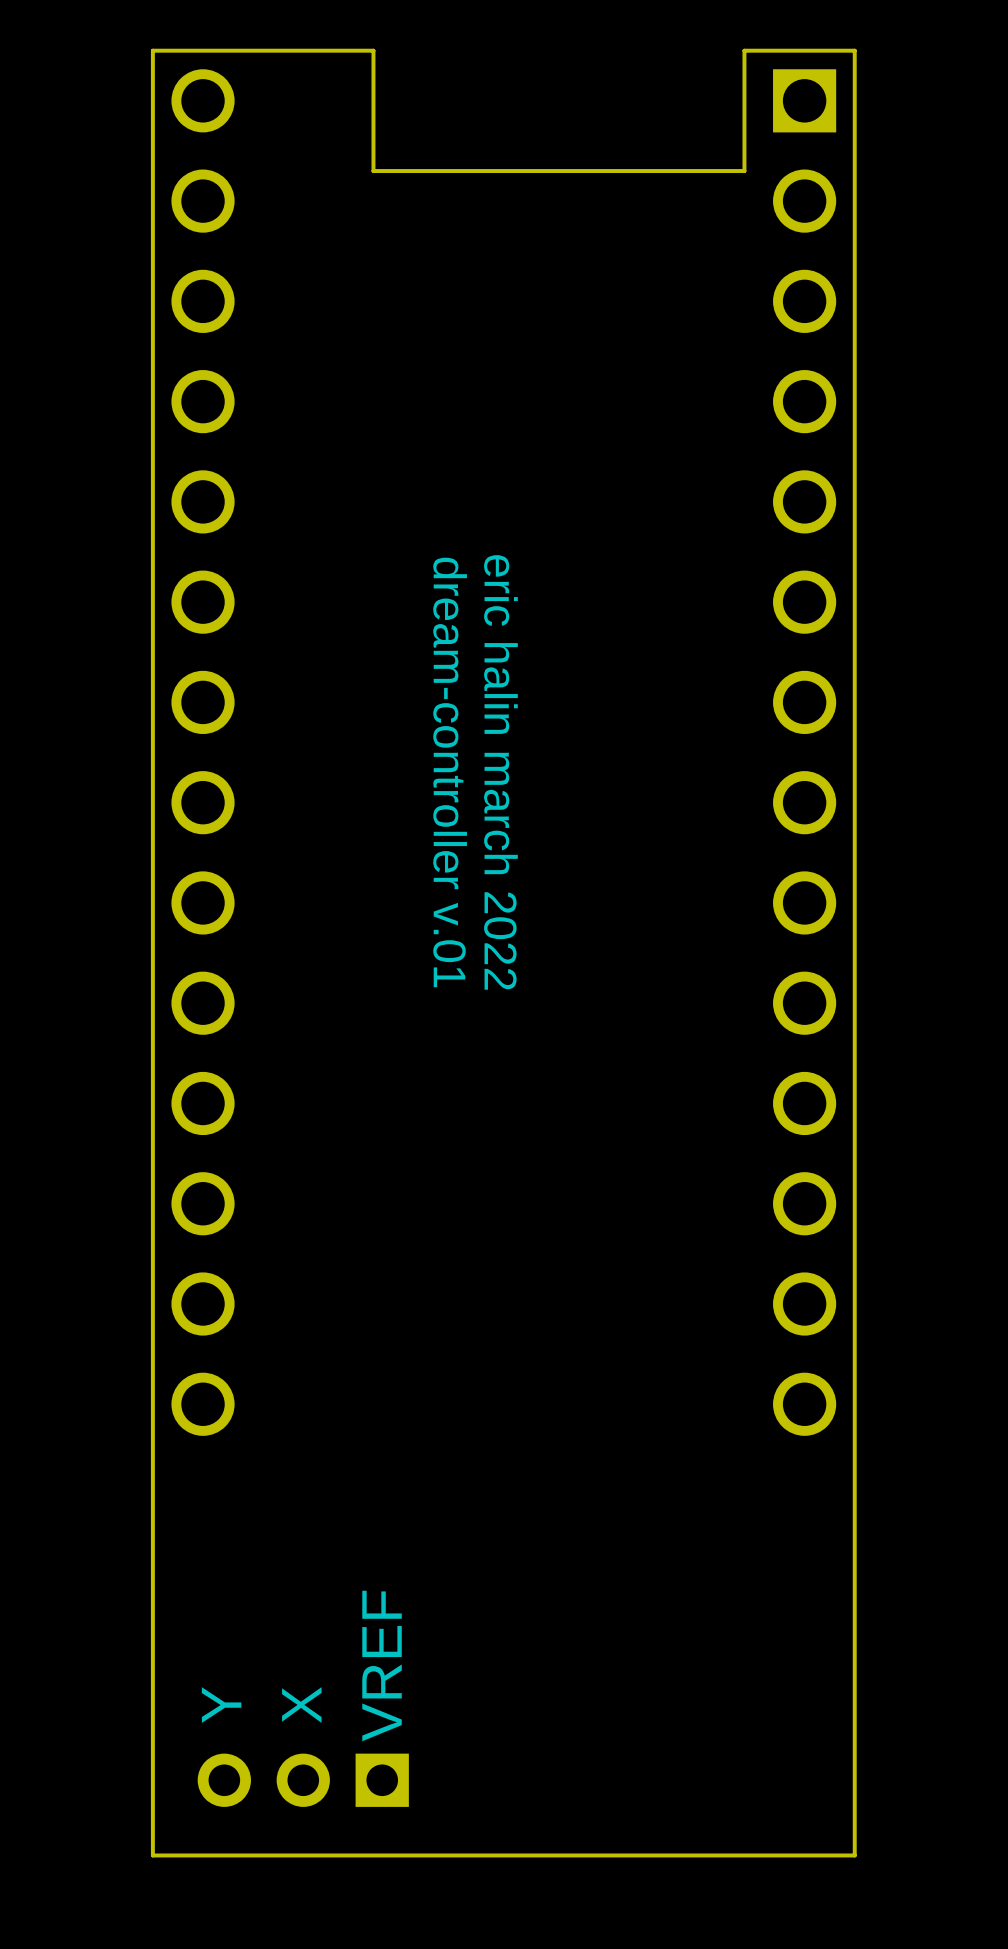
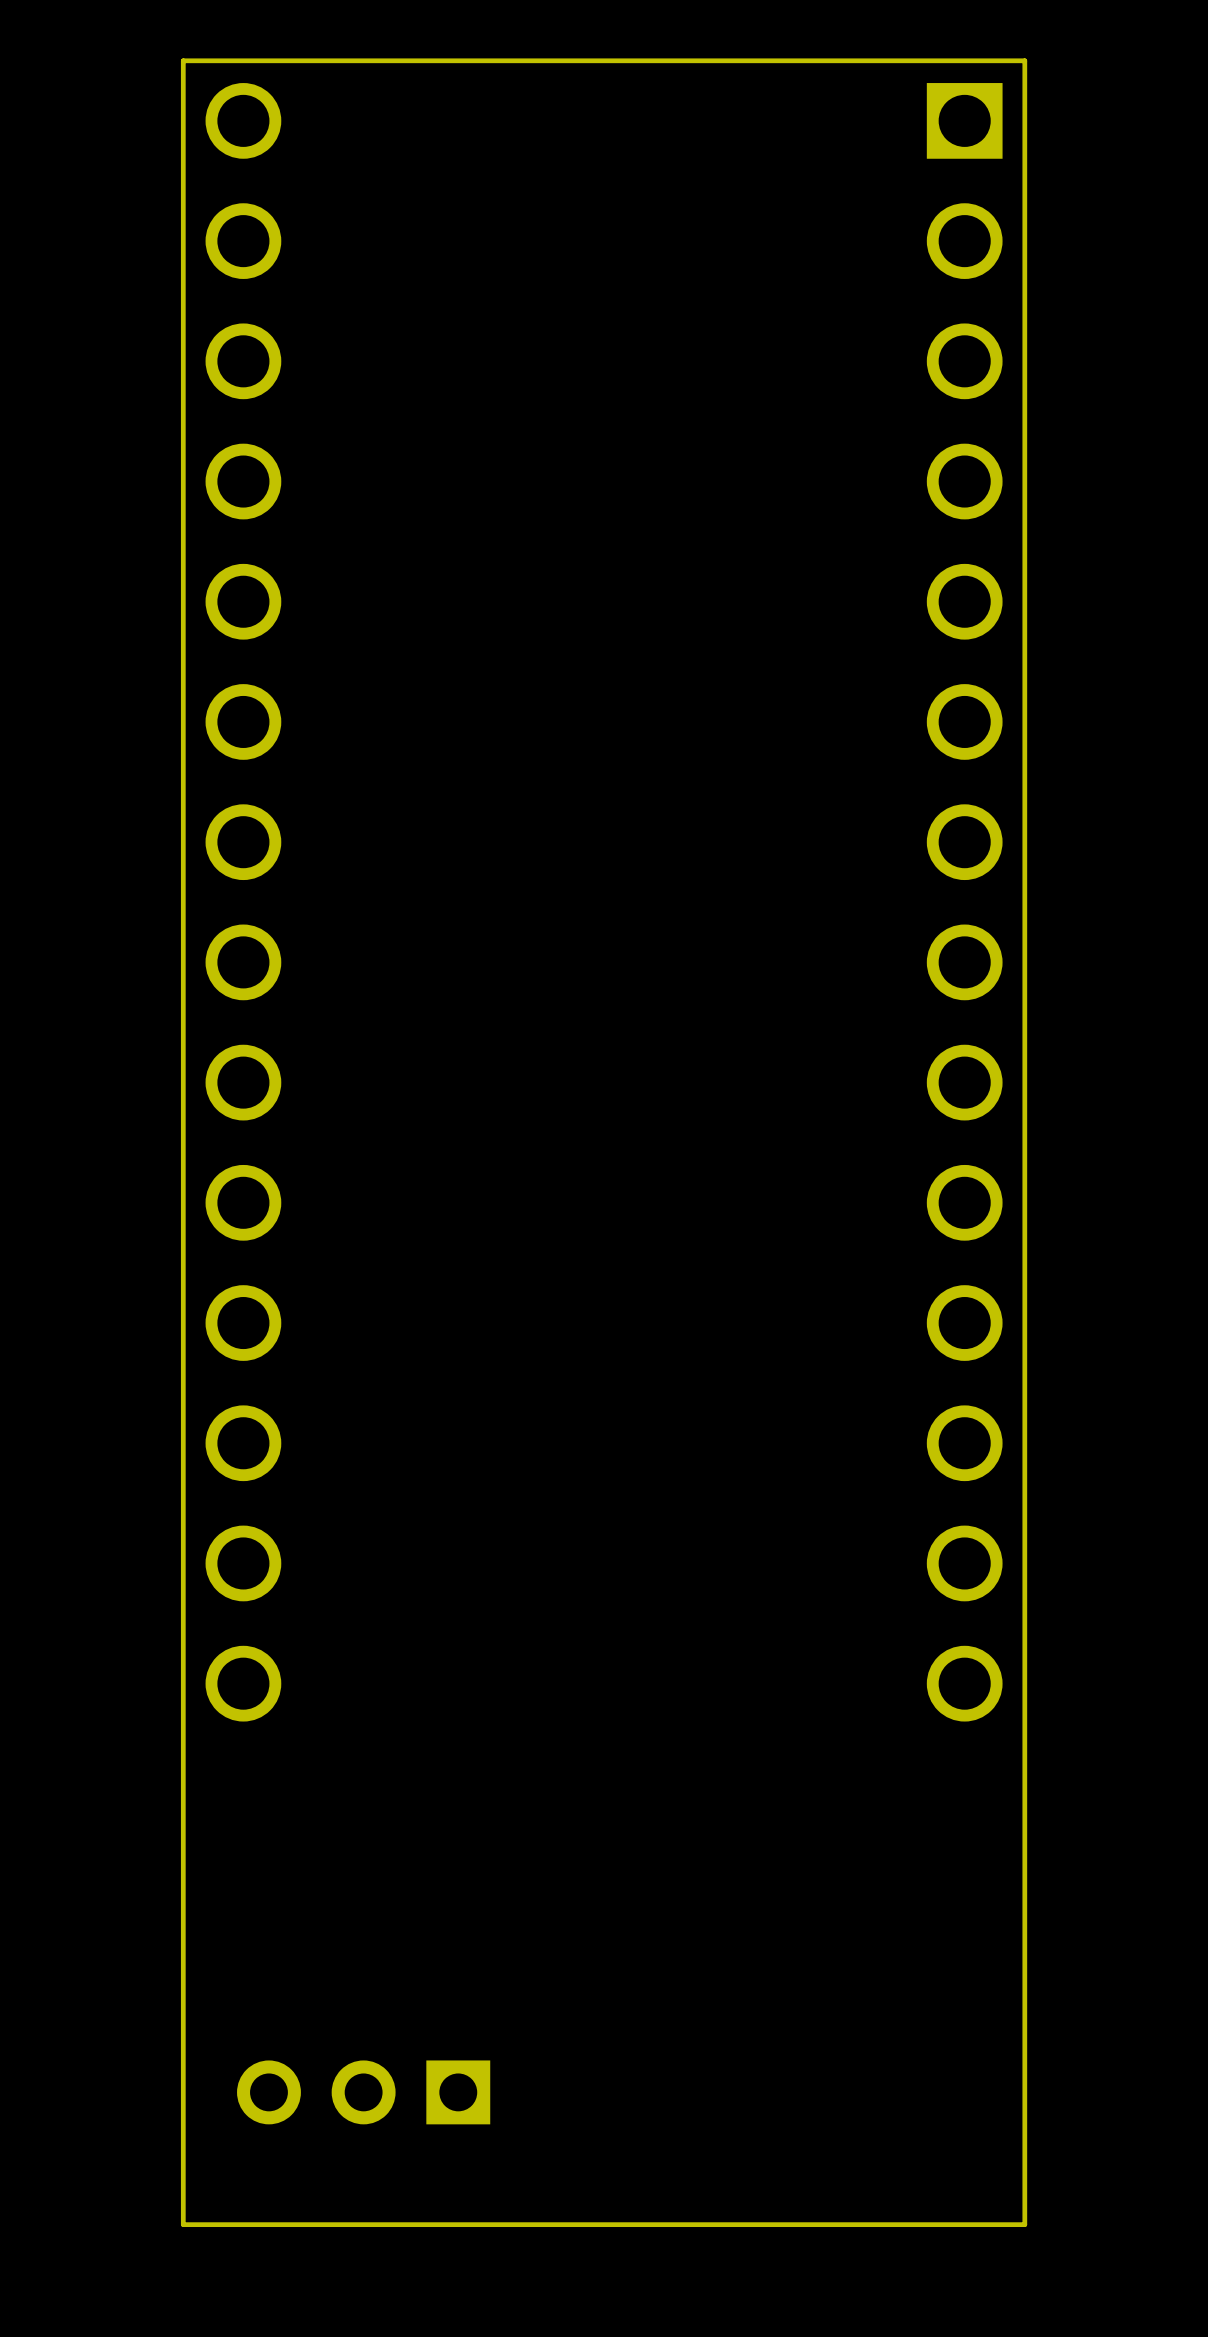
board edge: (744, 50) (744, 171) (373, 171) (373, 50) -> (892, 60) (447, 60)
text: dream-controller v.01 (450, 772) -> none
text: eric halin march 2022 (500, 772) -> none
text: VREF (382, 1665) -> none
text: Y (221, 1705) -> none
text: X (301, 1705) -> none
part position: (303, 1780) -> (363, 2092)

